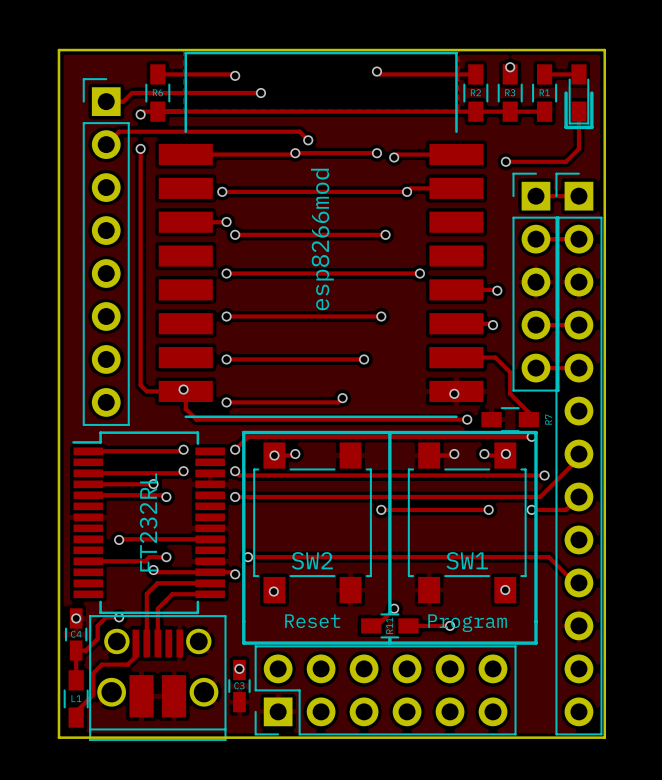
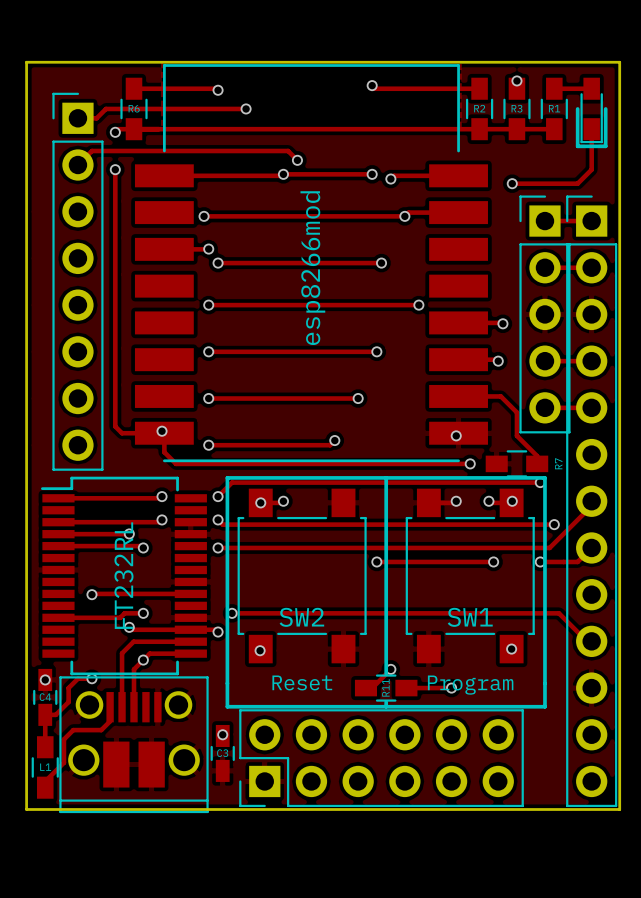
via: none -> (143, 660)

